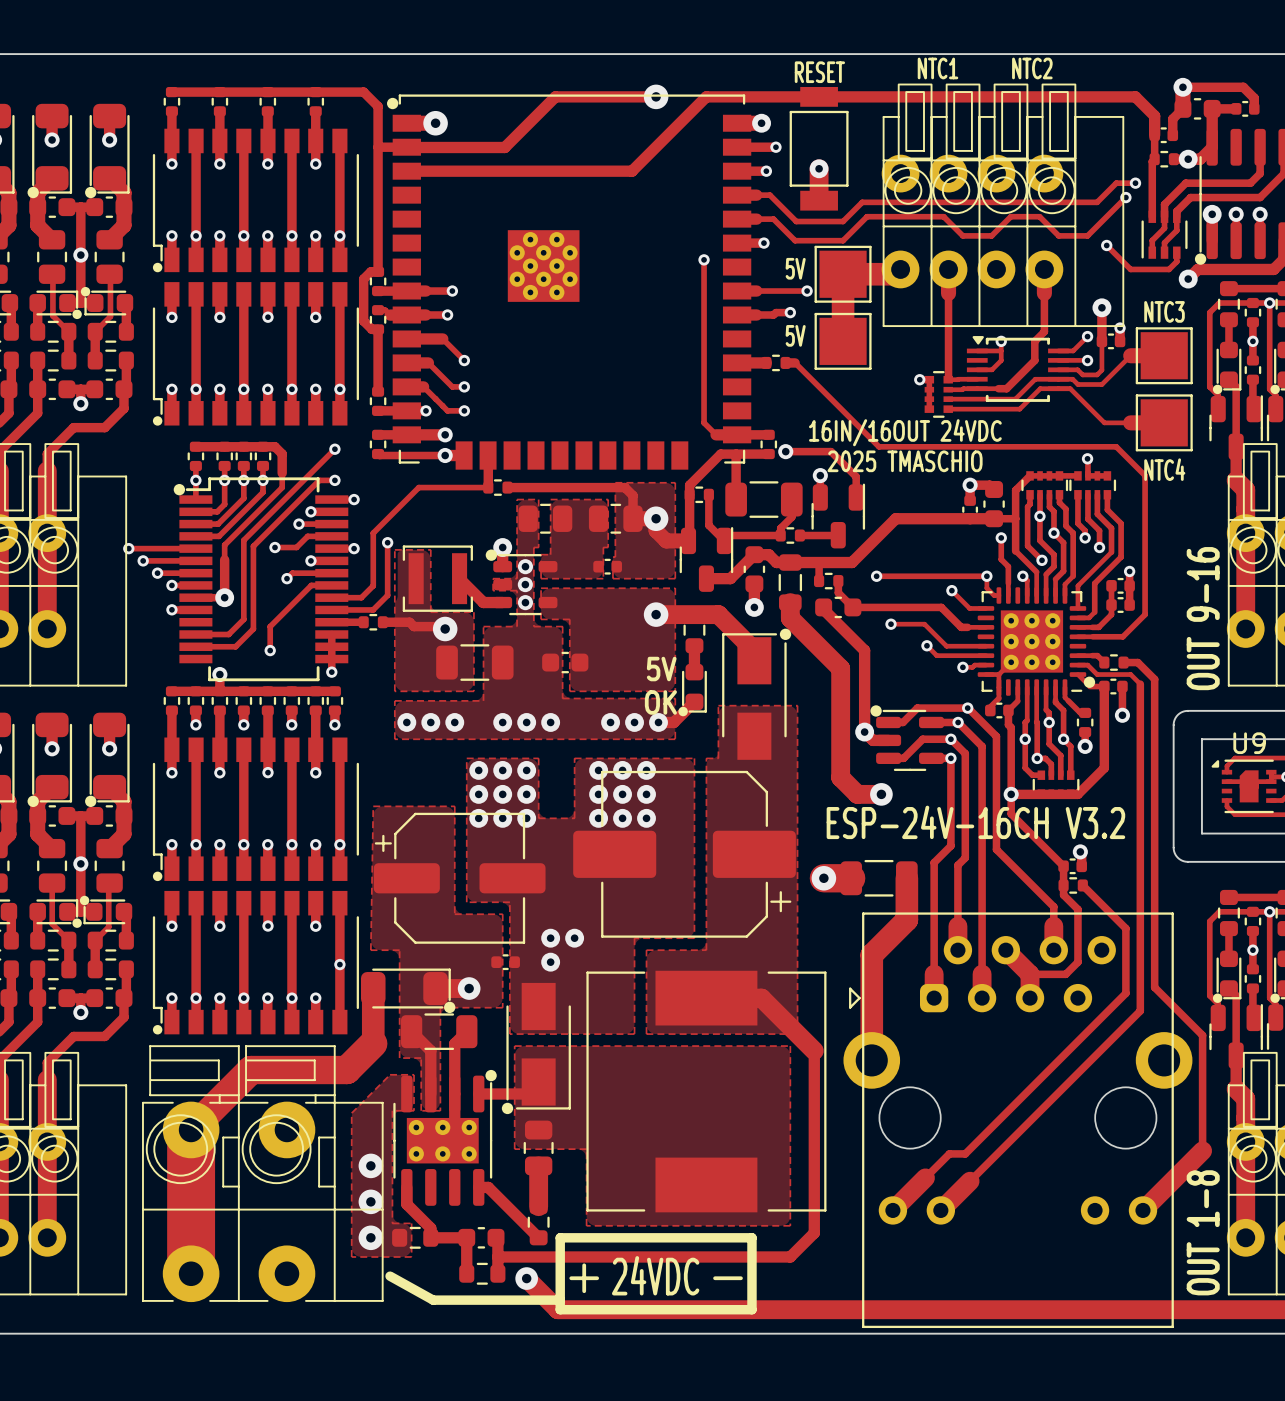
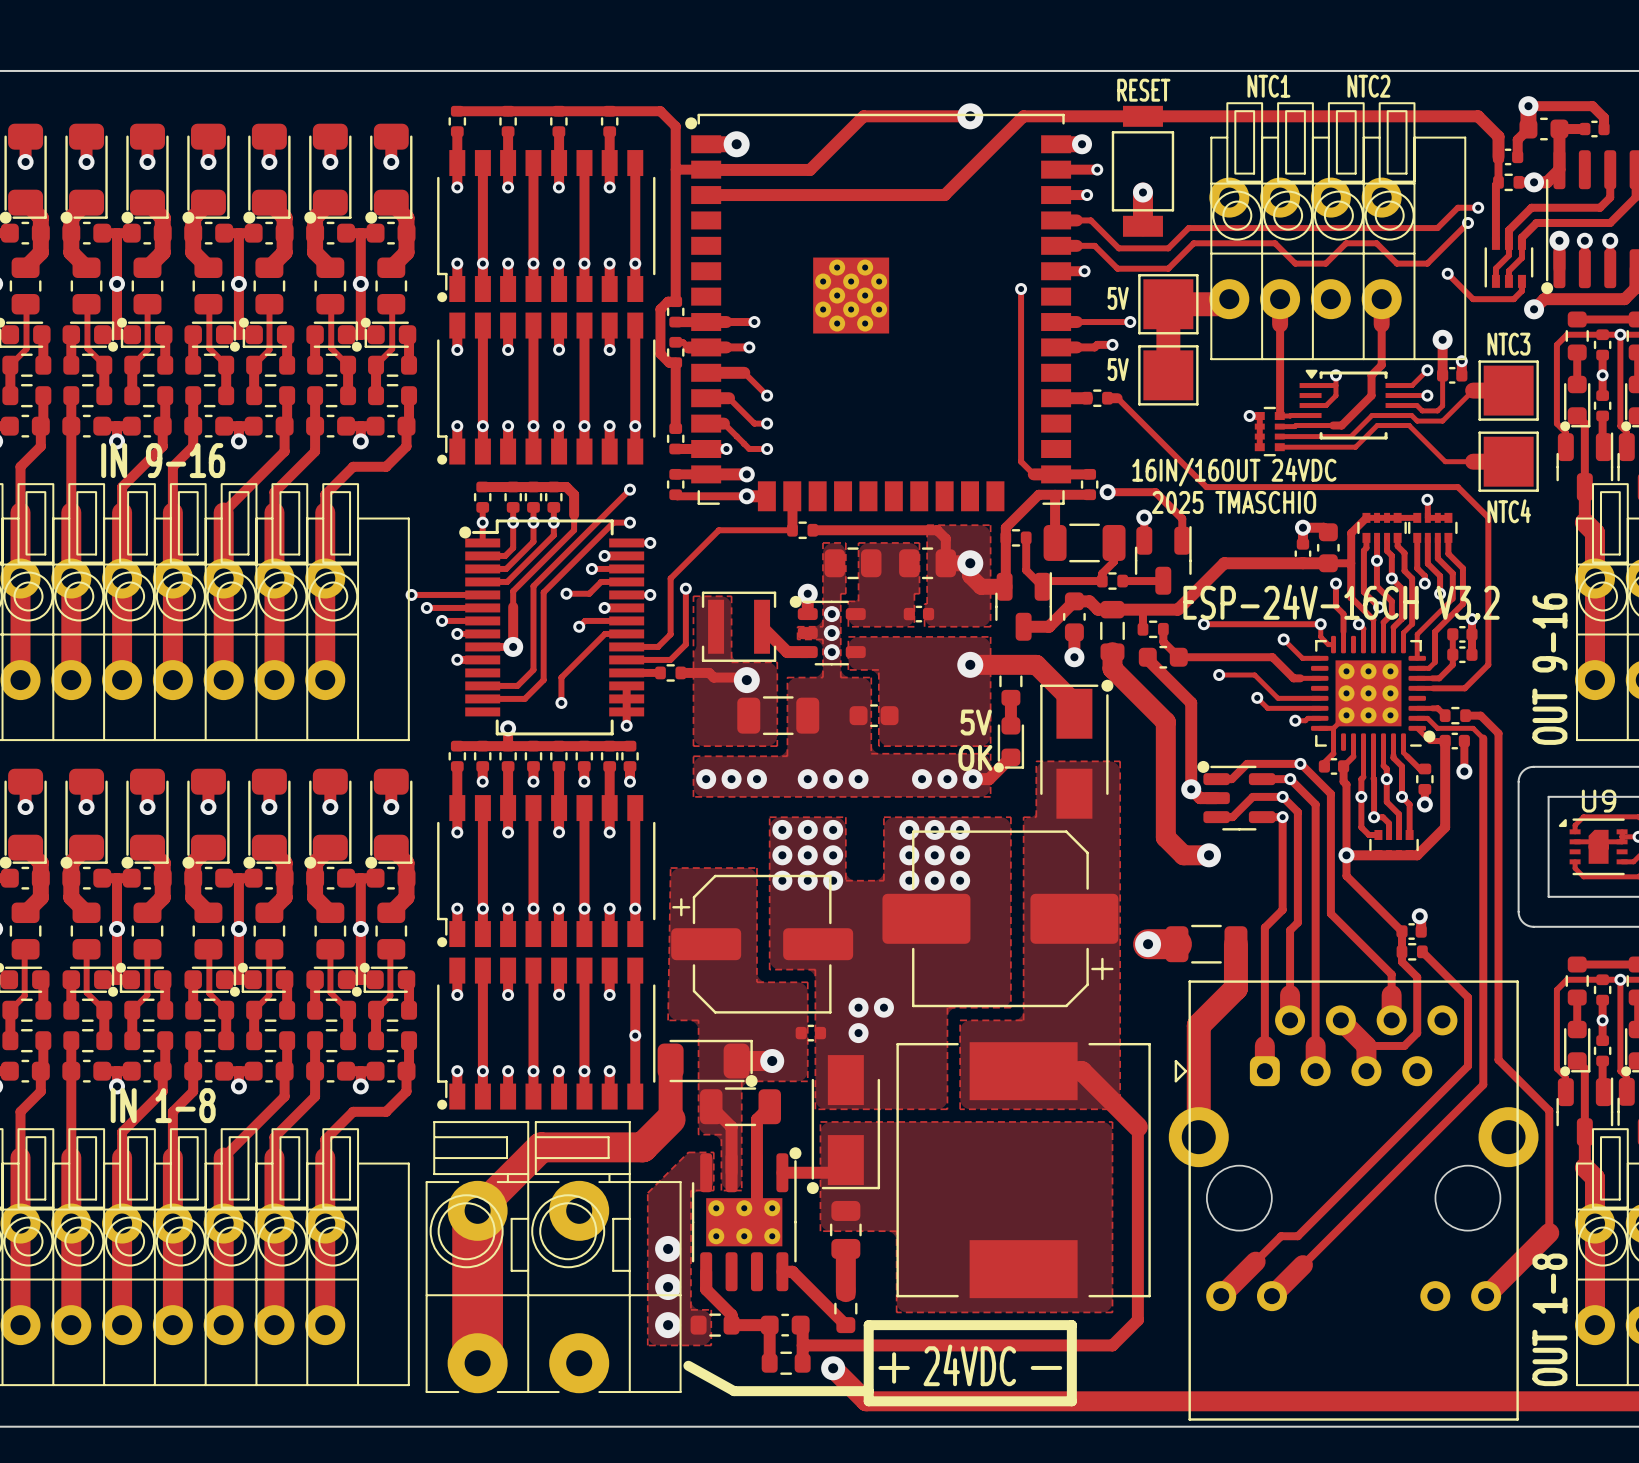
text position: ESP-24V-16CH V3.2 (975, 822) -> ESP-24V-16CH V3.2 (1341, 602)

